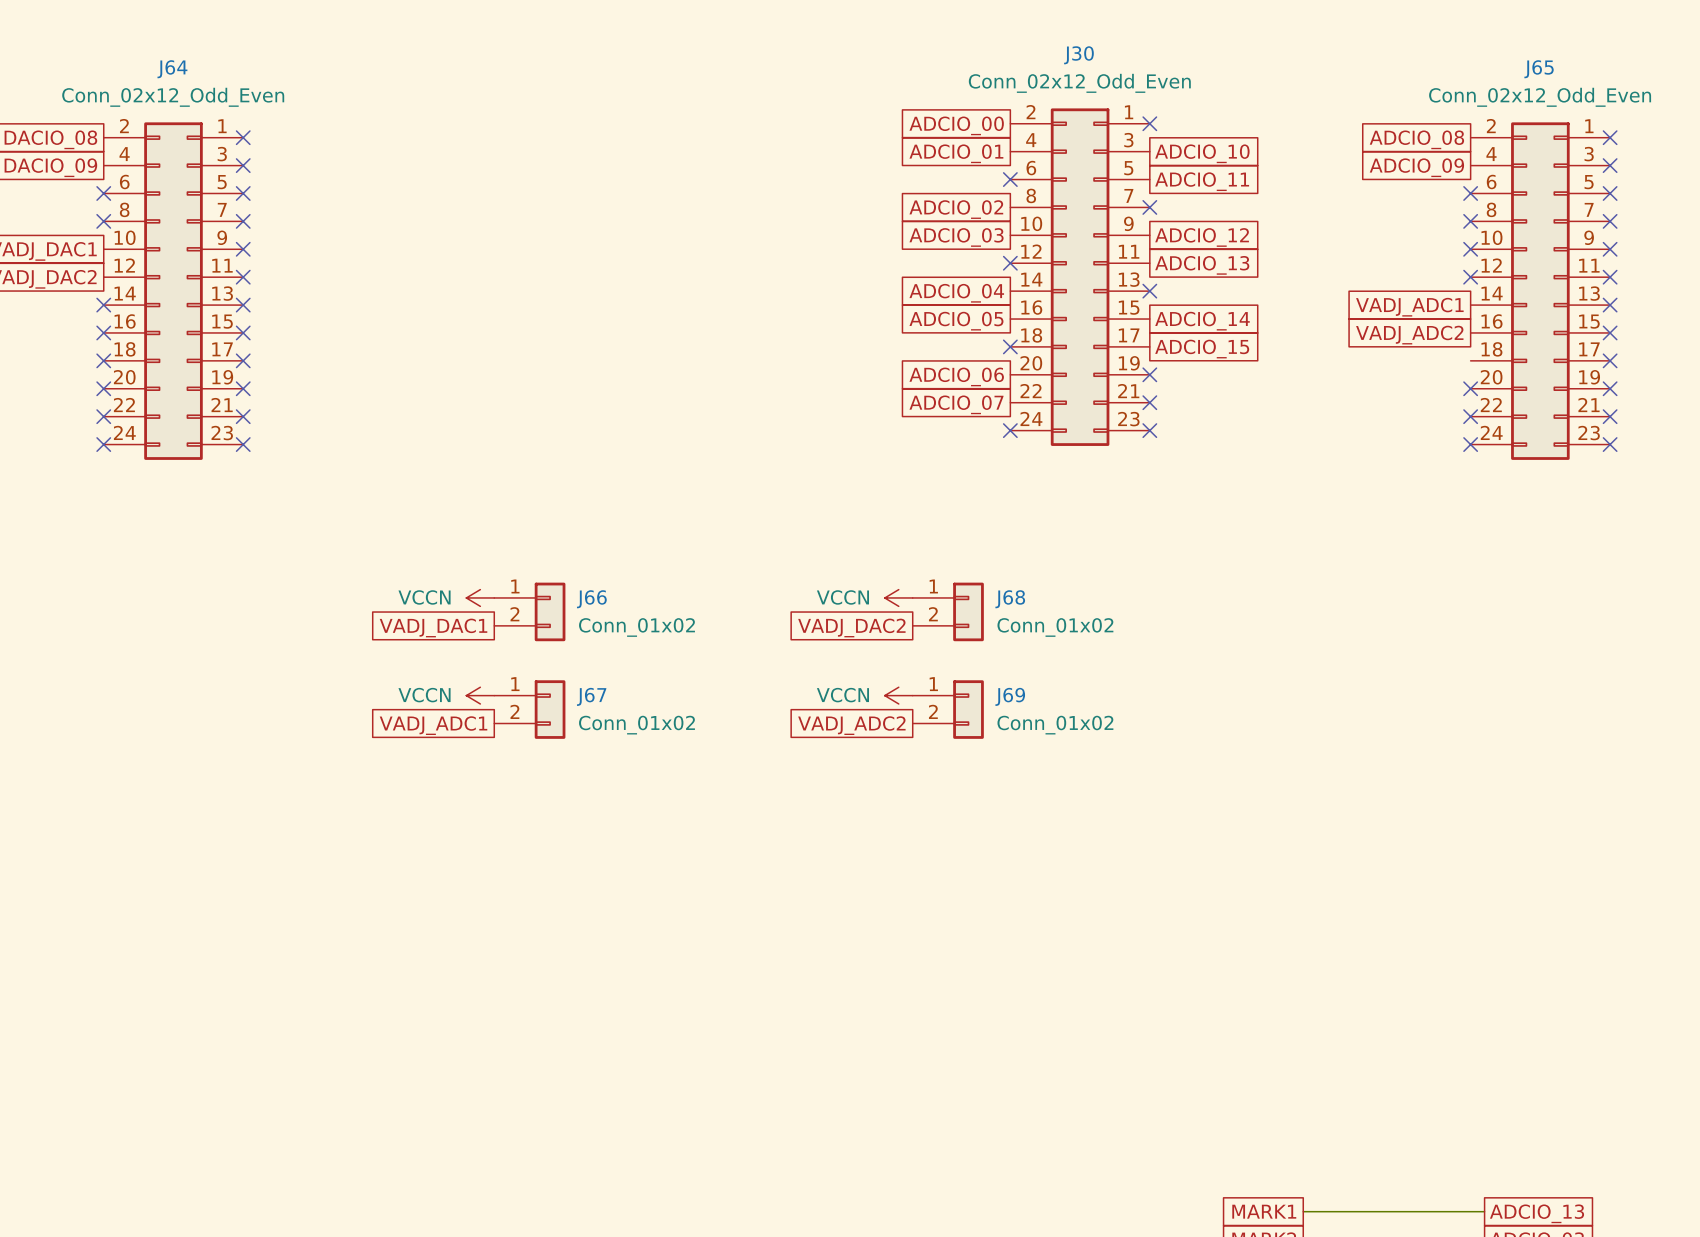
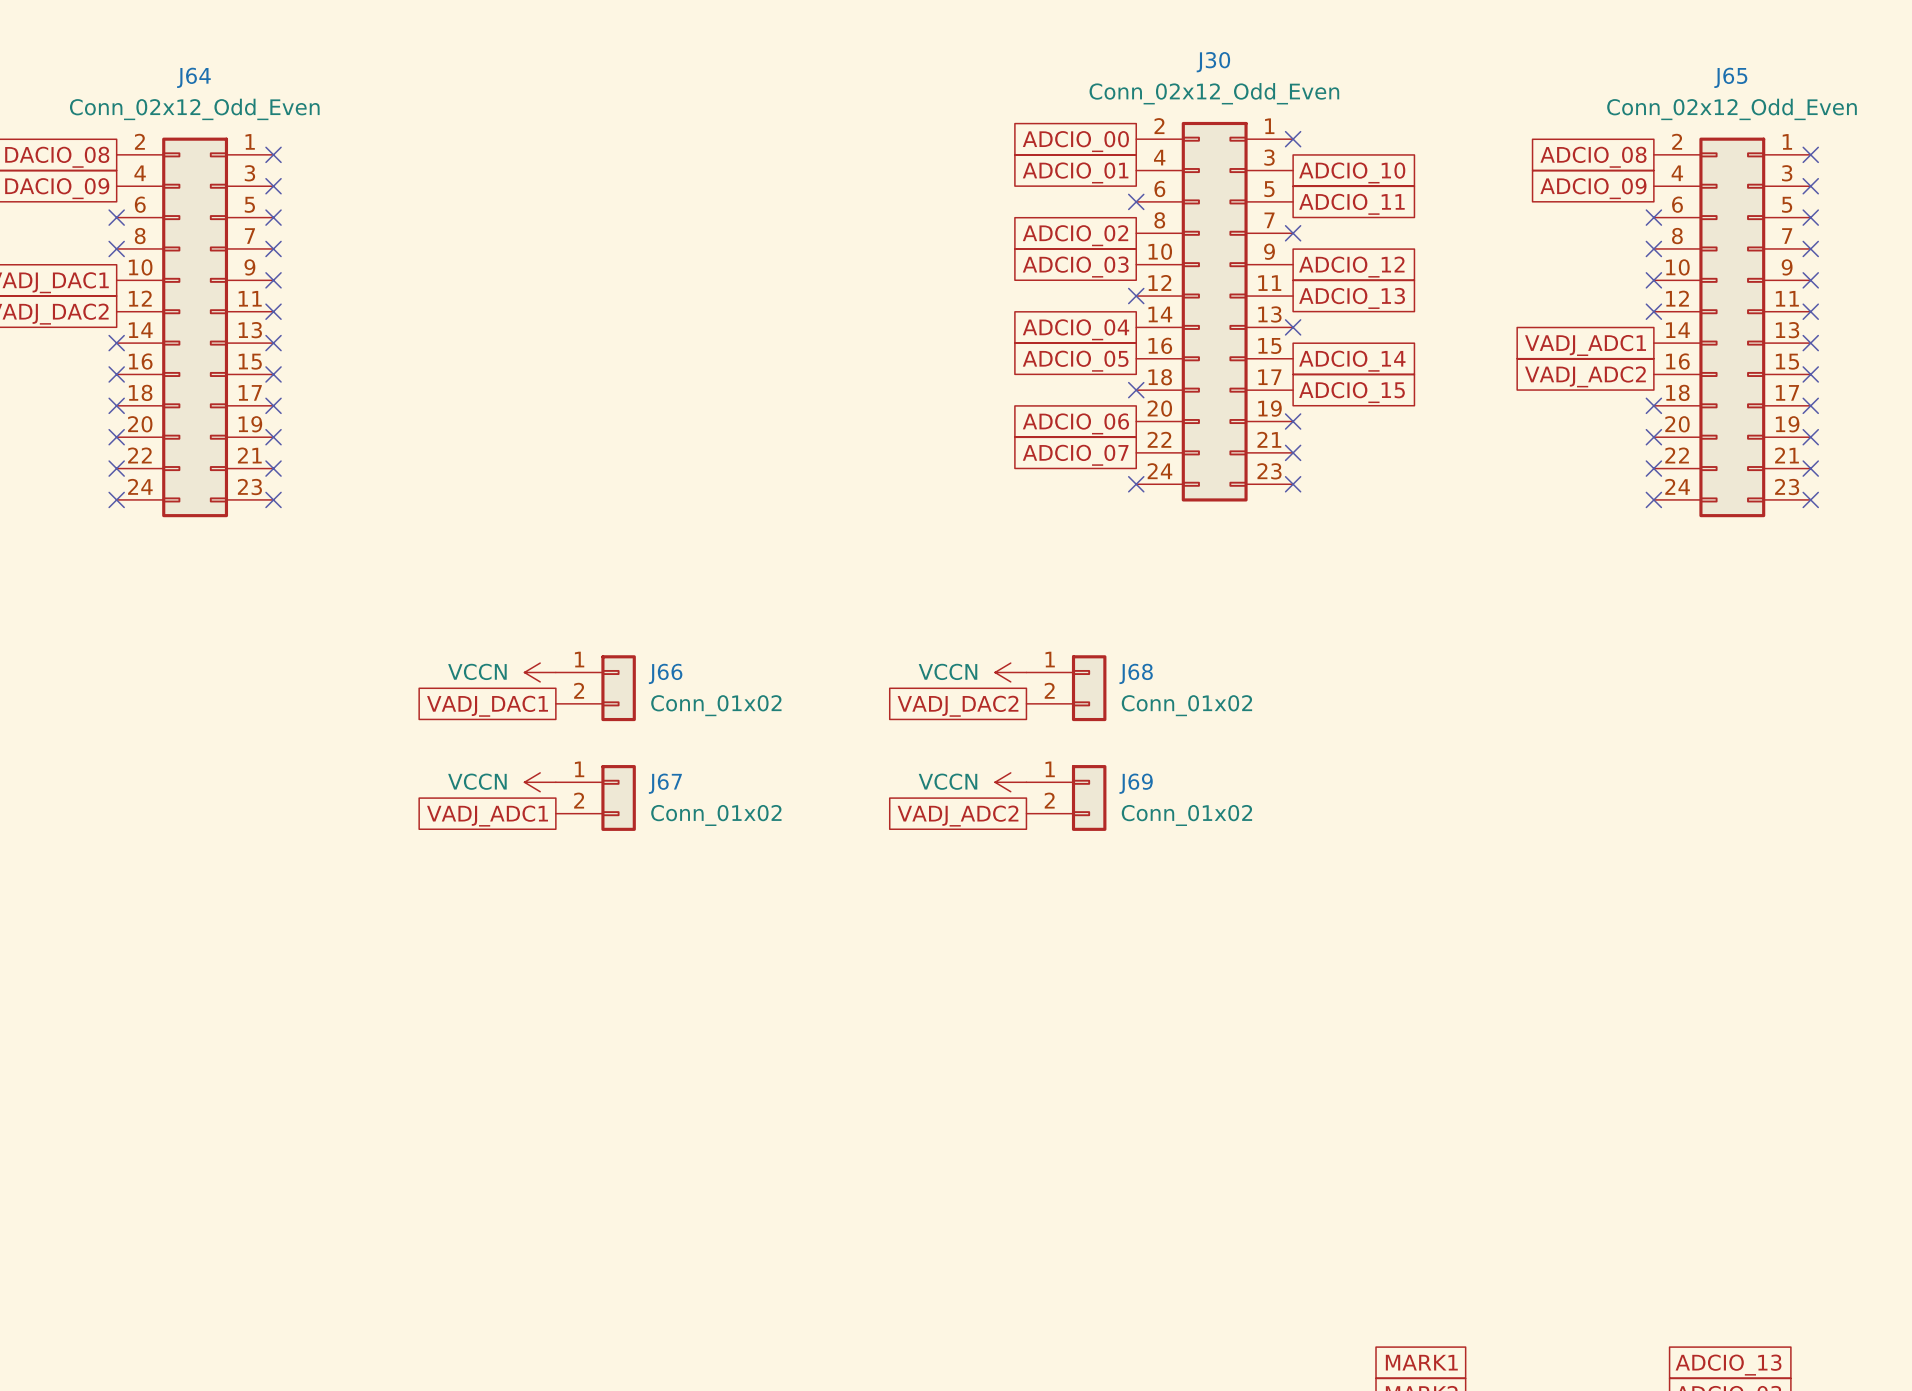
no-connect mark: none -> (1653, 405)
wire: (1303, 1211) (1484, 1211) -> none

